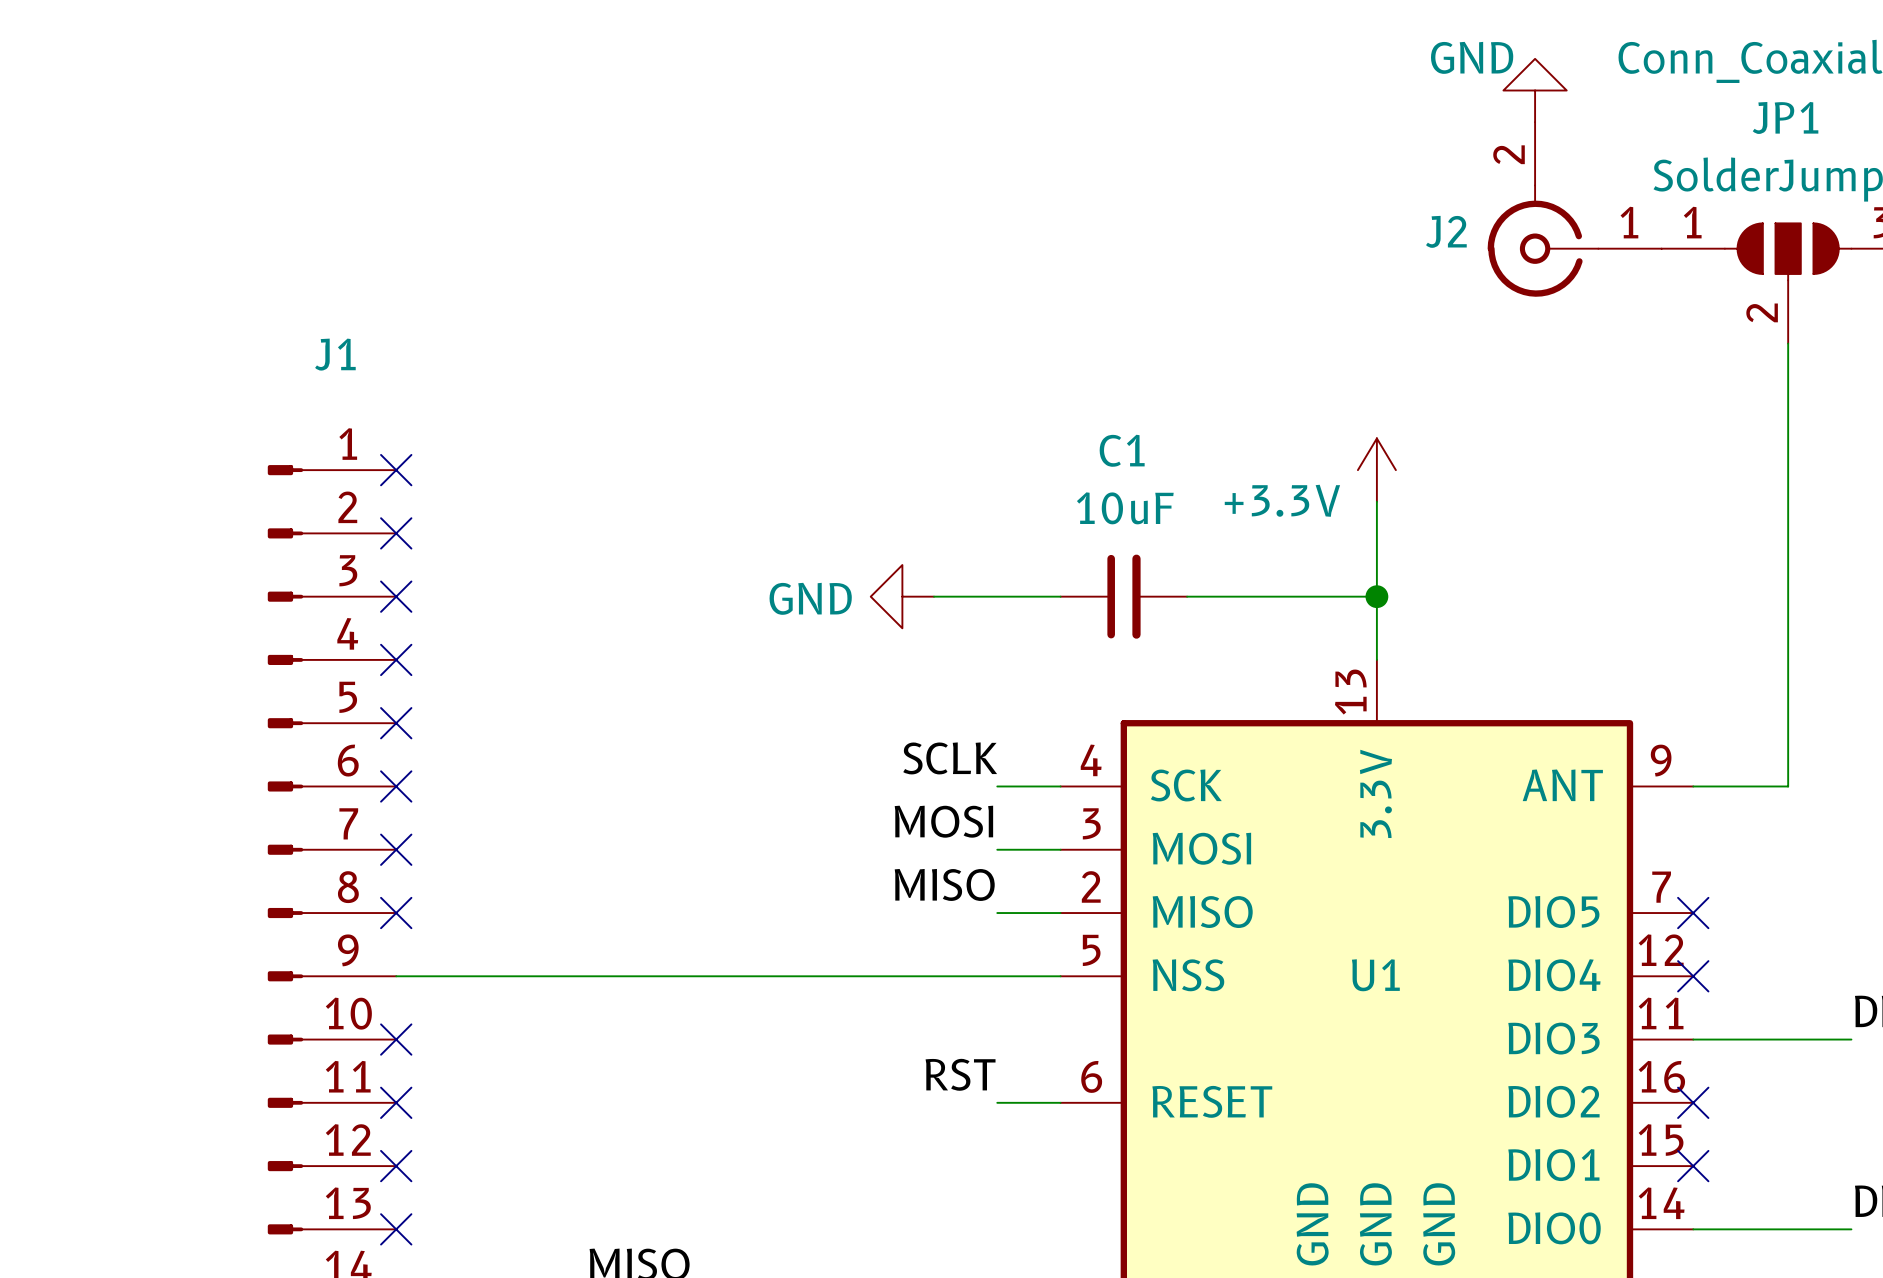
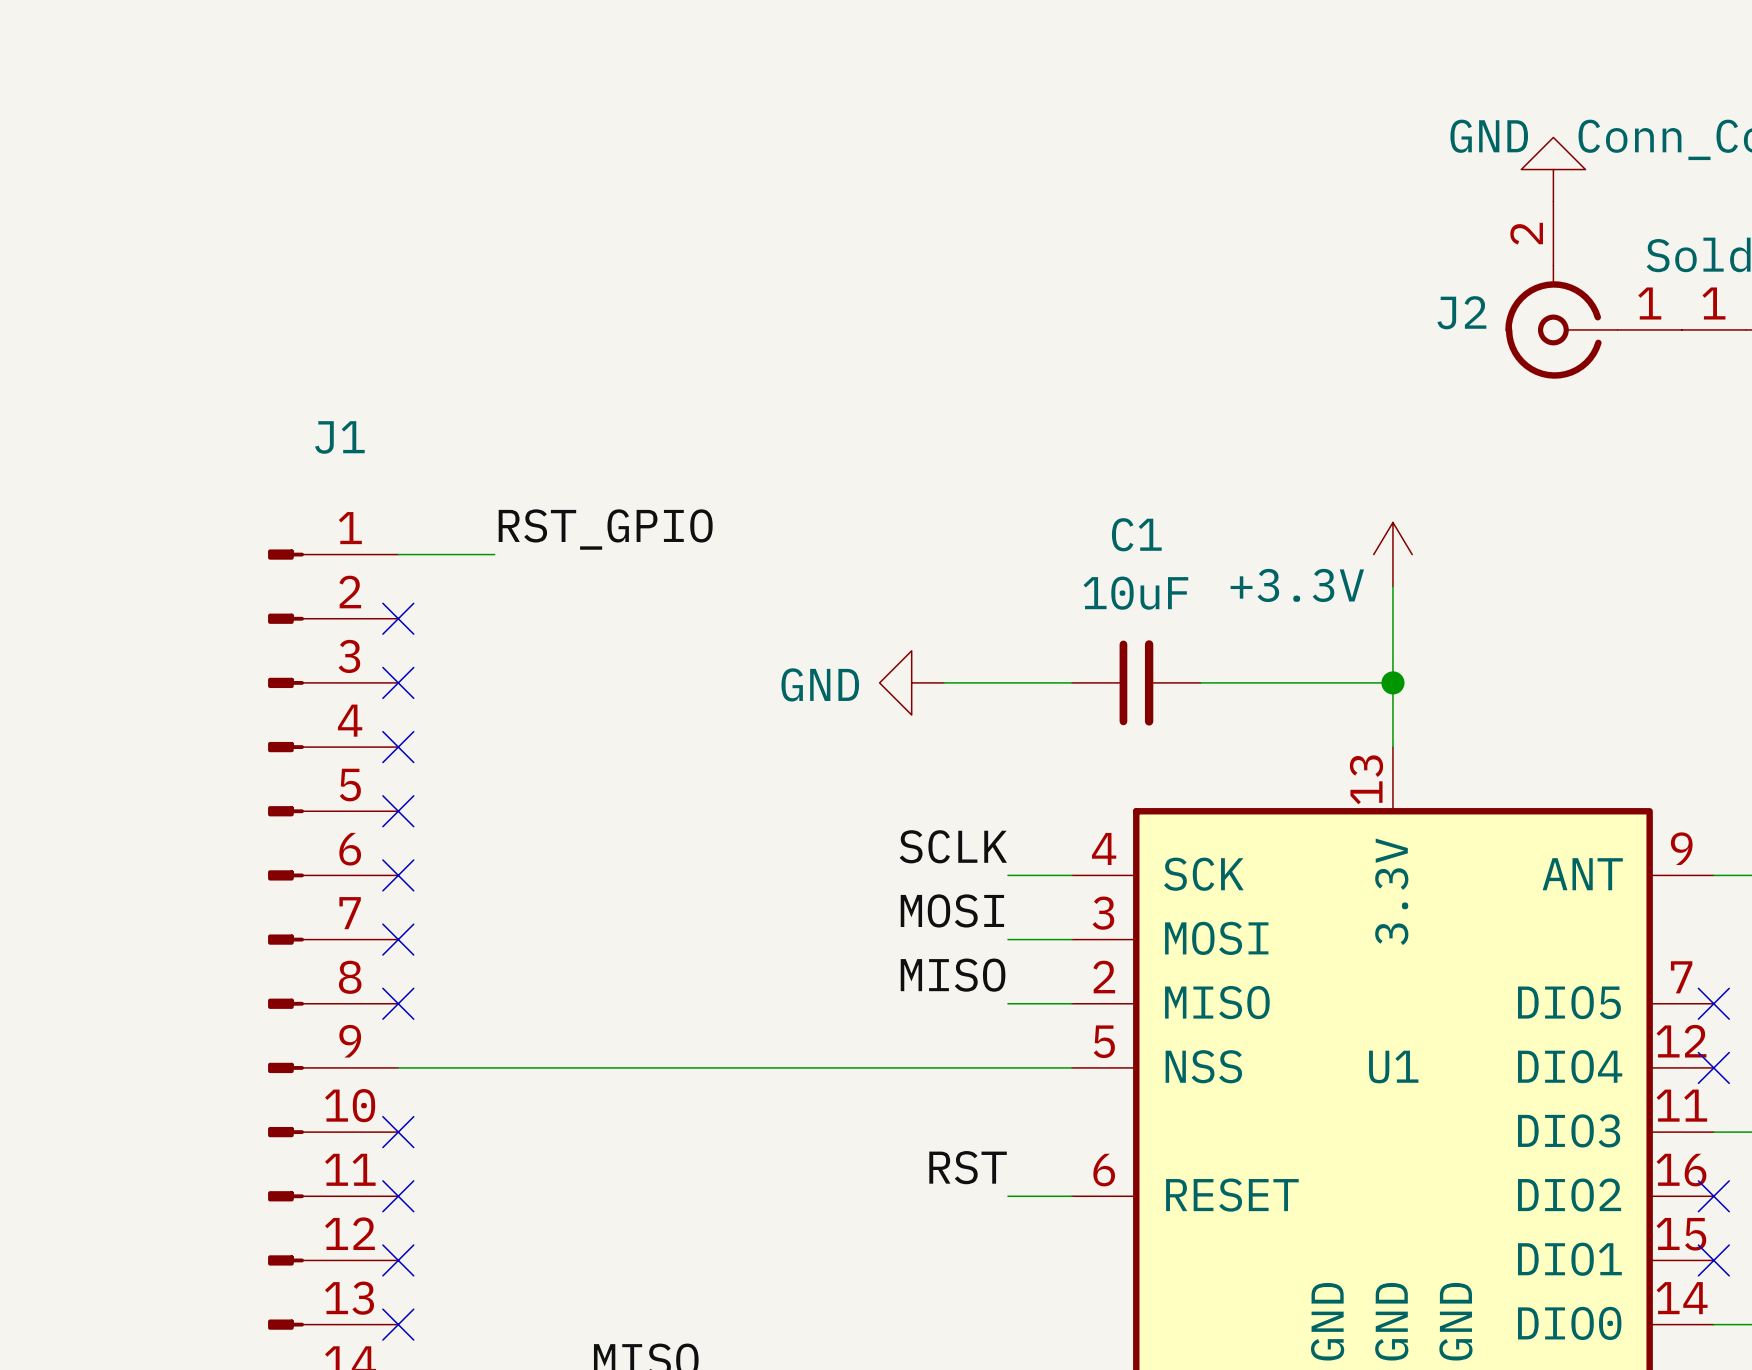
label: none -> RST_GPIO (605, 529)
wire: none -> (398, 554) (494, 554)
no-connect mark: (396, 470) -> none

